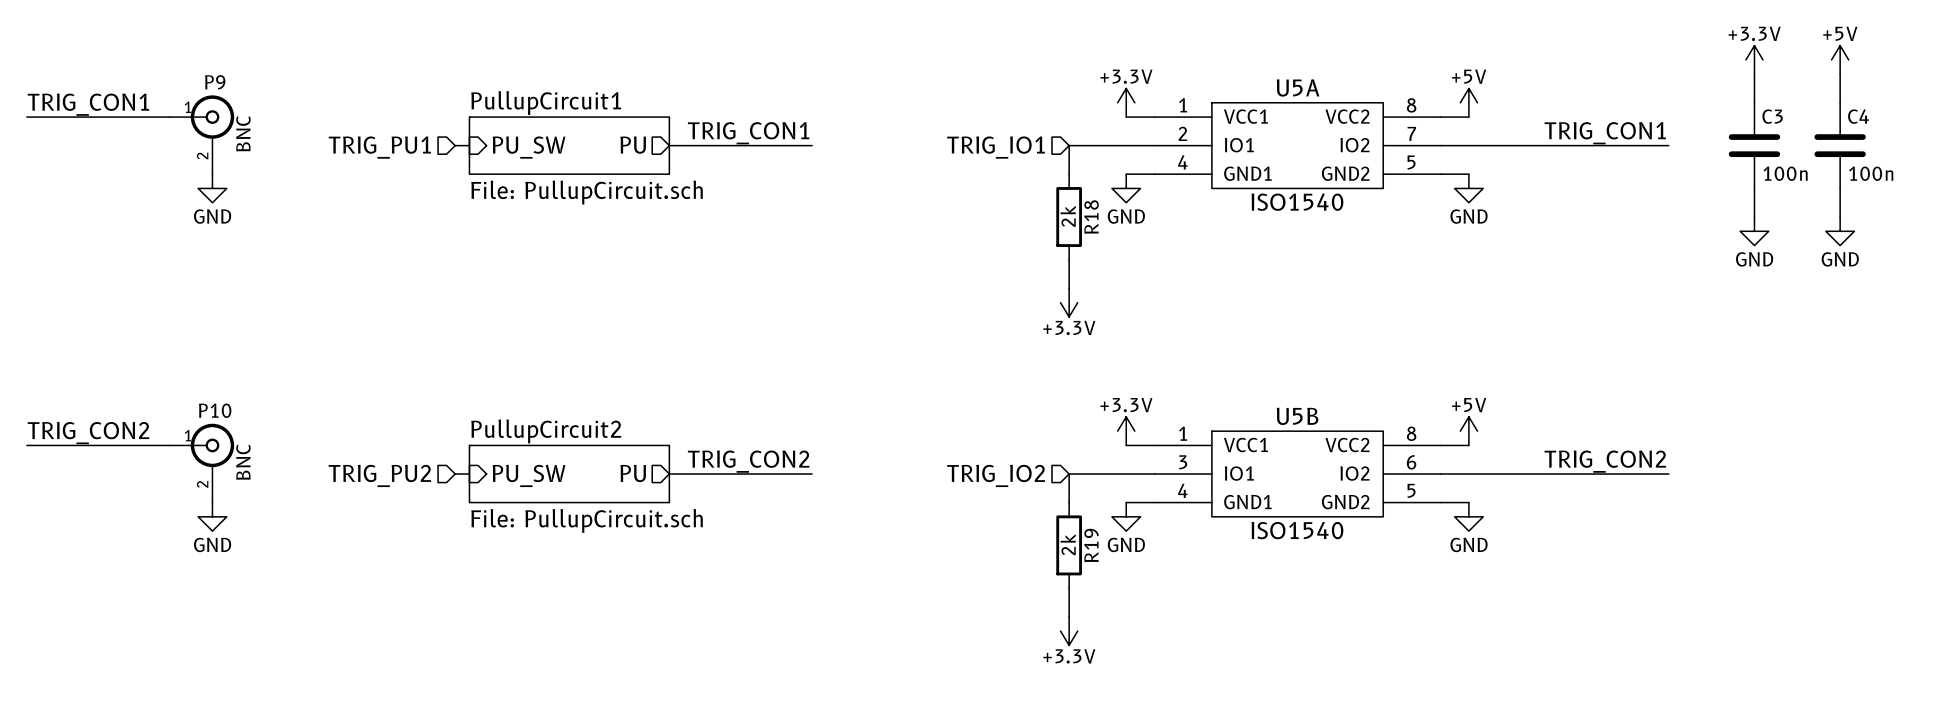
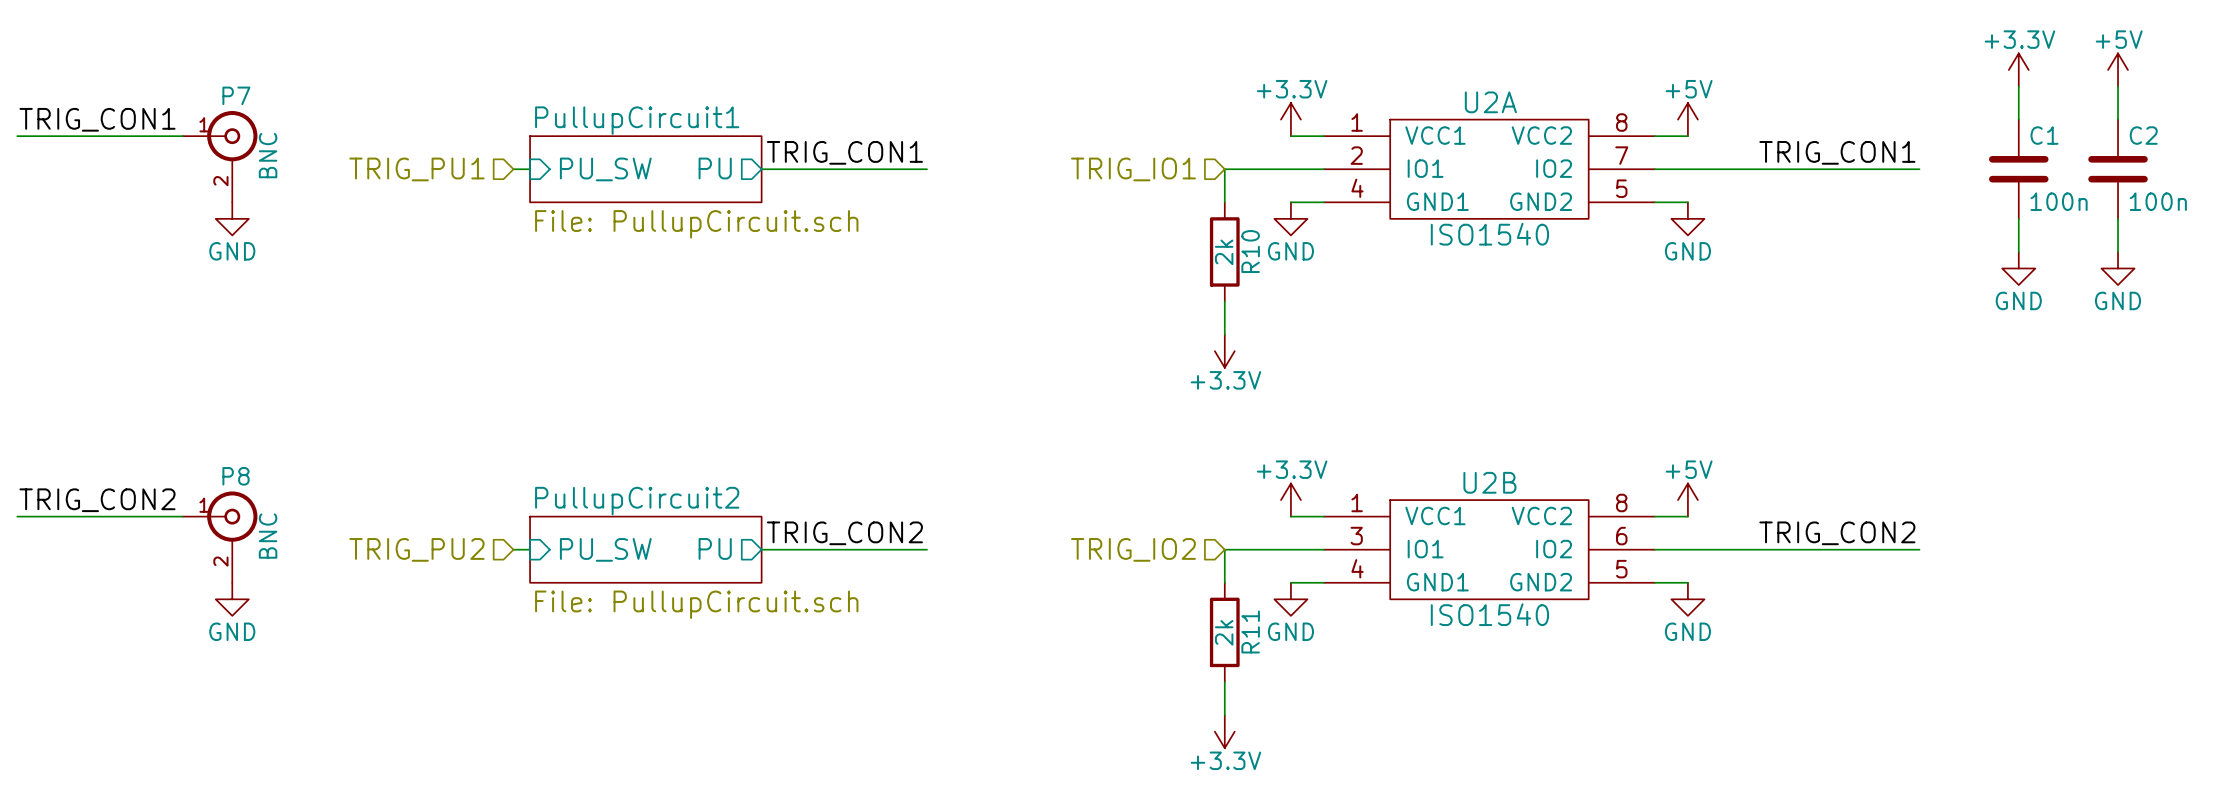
P9 name: P9 (215, 82) -> P7 (236, 95)
U5A name: U5A (1298, 87) -> U2A (1490, 102)
C3 name: C3 (1772, 116) -> C1 (2044, 135)
C4 name: C4 (1858, 116) -> C2 (2143, 135)
R18 name: R18 (1091, 217) -> R10 (1250, 251)
P10 name: P10 (215, 410) -> P8 (236, 476)
U5B name: U5B (1297, 416) -> U2B (1489, 482)
R19 name: R19 (1091, 545) -> R11 (1250, 632)

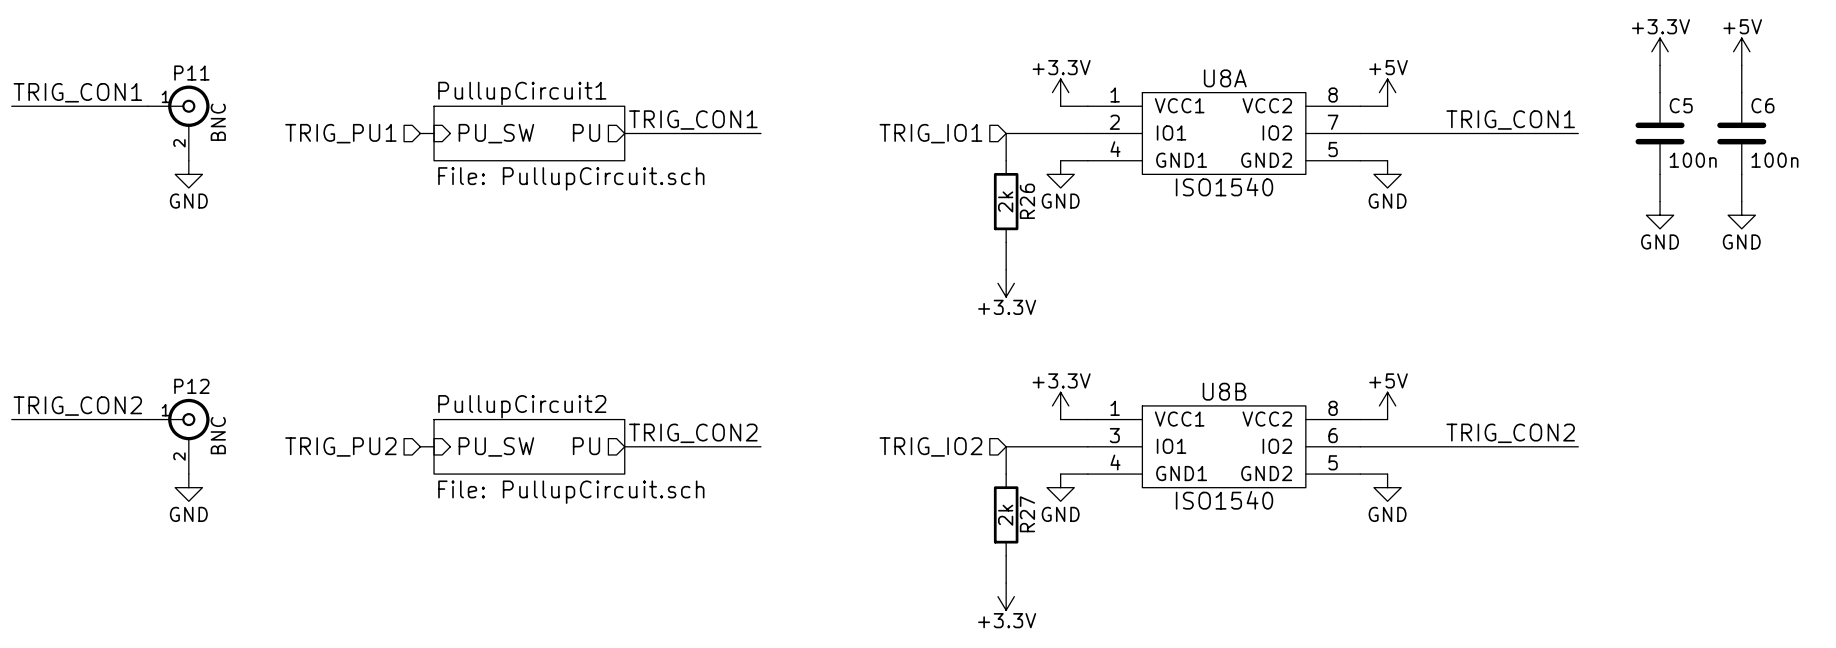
P7 name: P7 (236, 95) -> P11 (191, 73)
U2A name: U2A (1490, 102) -> U8A (1225, 78)
C1 name: C1 (2044, 135) -> C5 (1681, 105)
C2 name: C2 (2143, 135) -> C6 (1762, 105)
R10 name: R10 (1250, 251) -> R26 (1027, 201)
P8 name: P8 (236, 476) -> P12 (191, 386)
U2B name: U2B (1489, 482) -> U8B (1224, 391)
R11 name: R11 (1250, 632) -> R27 (1027, 514)

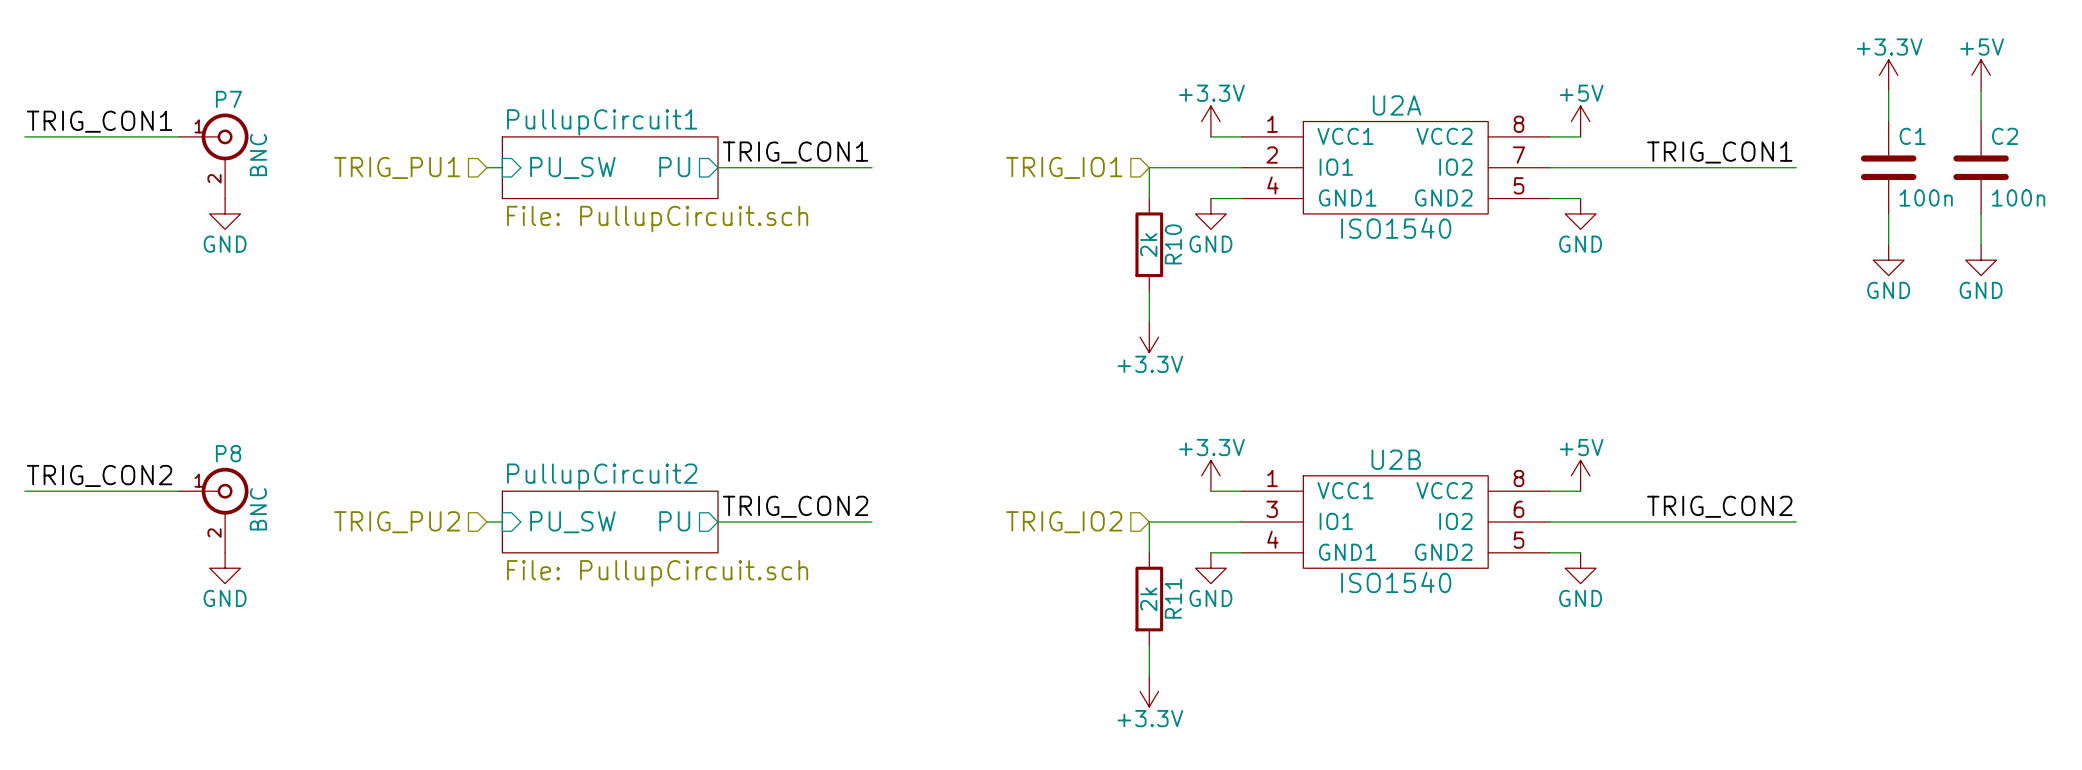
P11 name: P11 (191, 73) -> P7 (228, 99)
U8A name: U8A (1225, 78) -> U2A (1397, 105)
C5 name: C5 (1681, 105) -> C1 (1912, 136)
C6 name: C6 (1762, 105) -> C2 (2005, 136)
R26 name: R26 (1027, 201) -> R10 (1173, 244)
P12 name: P12 (191, 386) -> P8 (228, 453)
U8B name: U8B (1224, 391) -> U2B (1396, 459)
R27 name: R27 (1027, 514) -> R11 (1173, 598)

